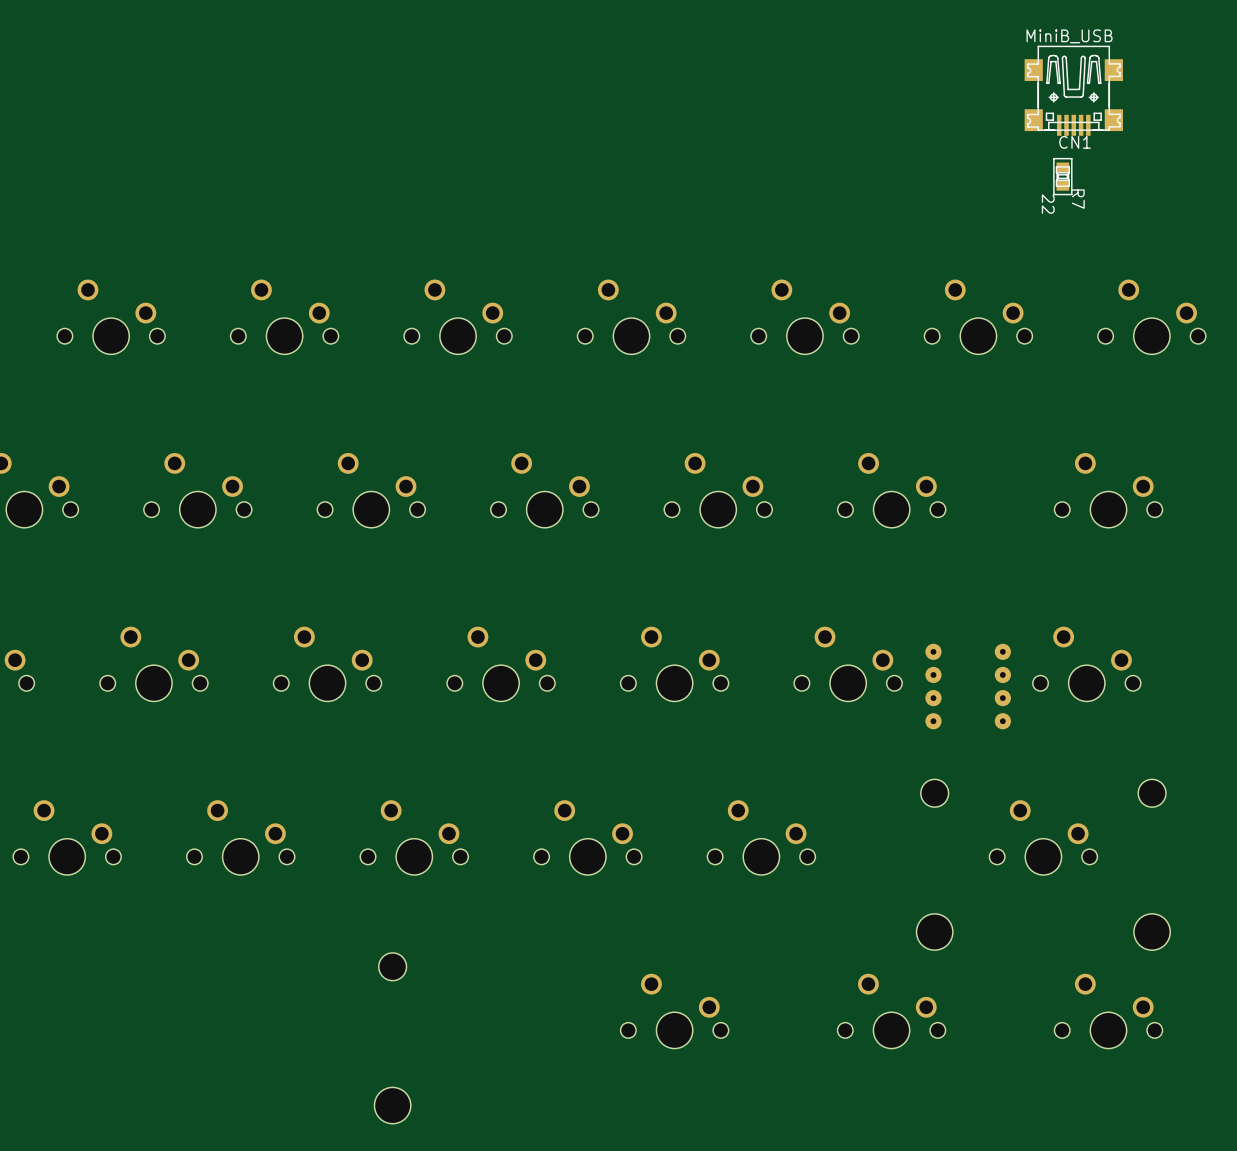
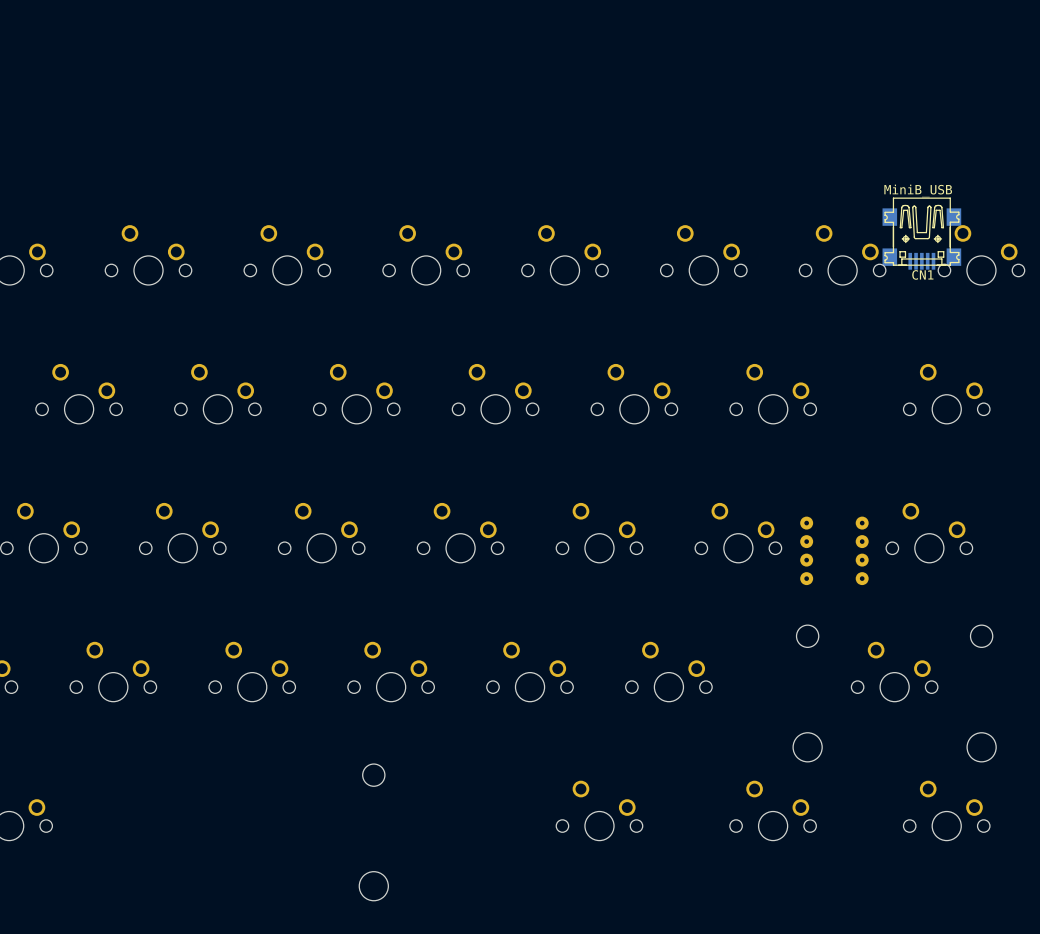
CN1 position: (1073, 90) -> (921, 233)
R7: 22 (1062, 176) -> none

